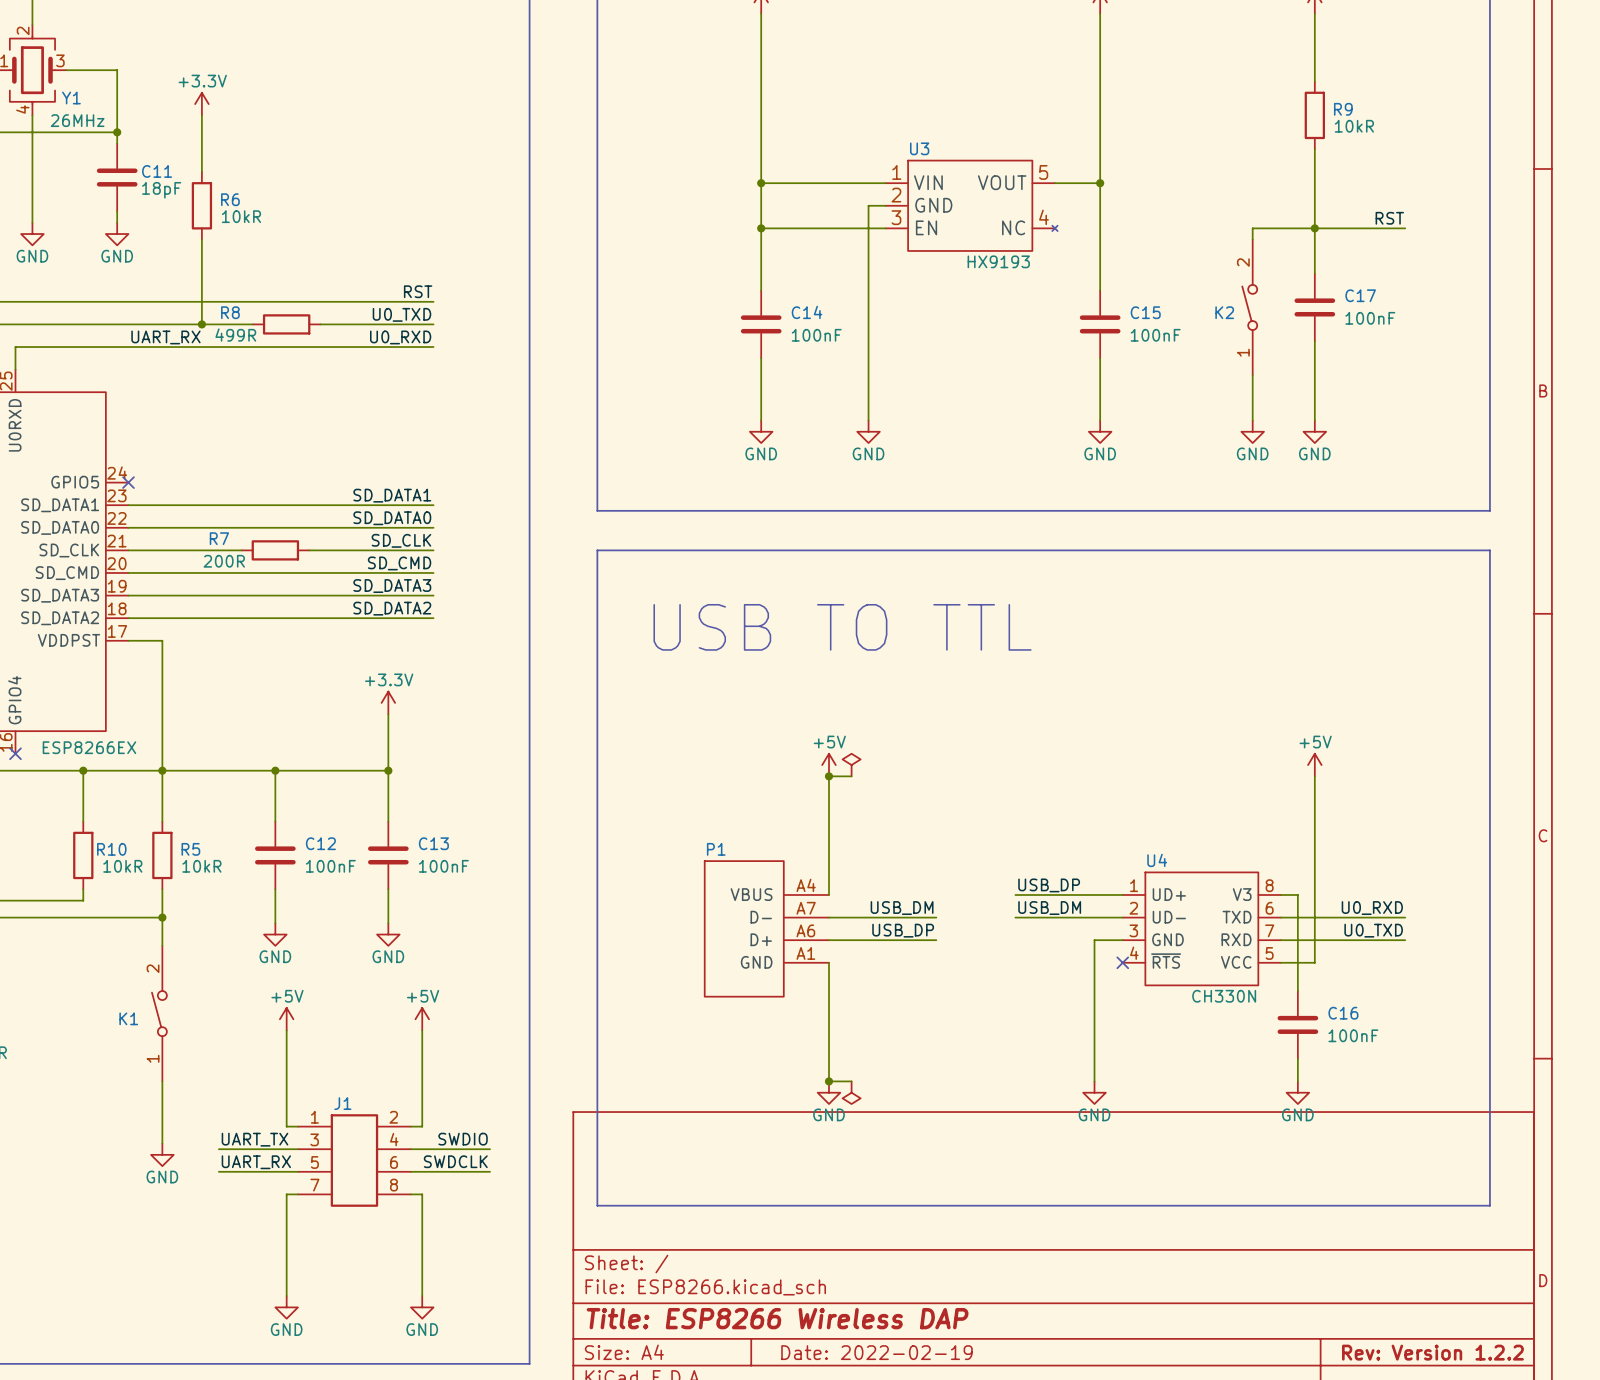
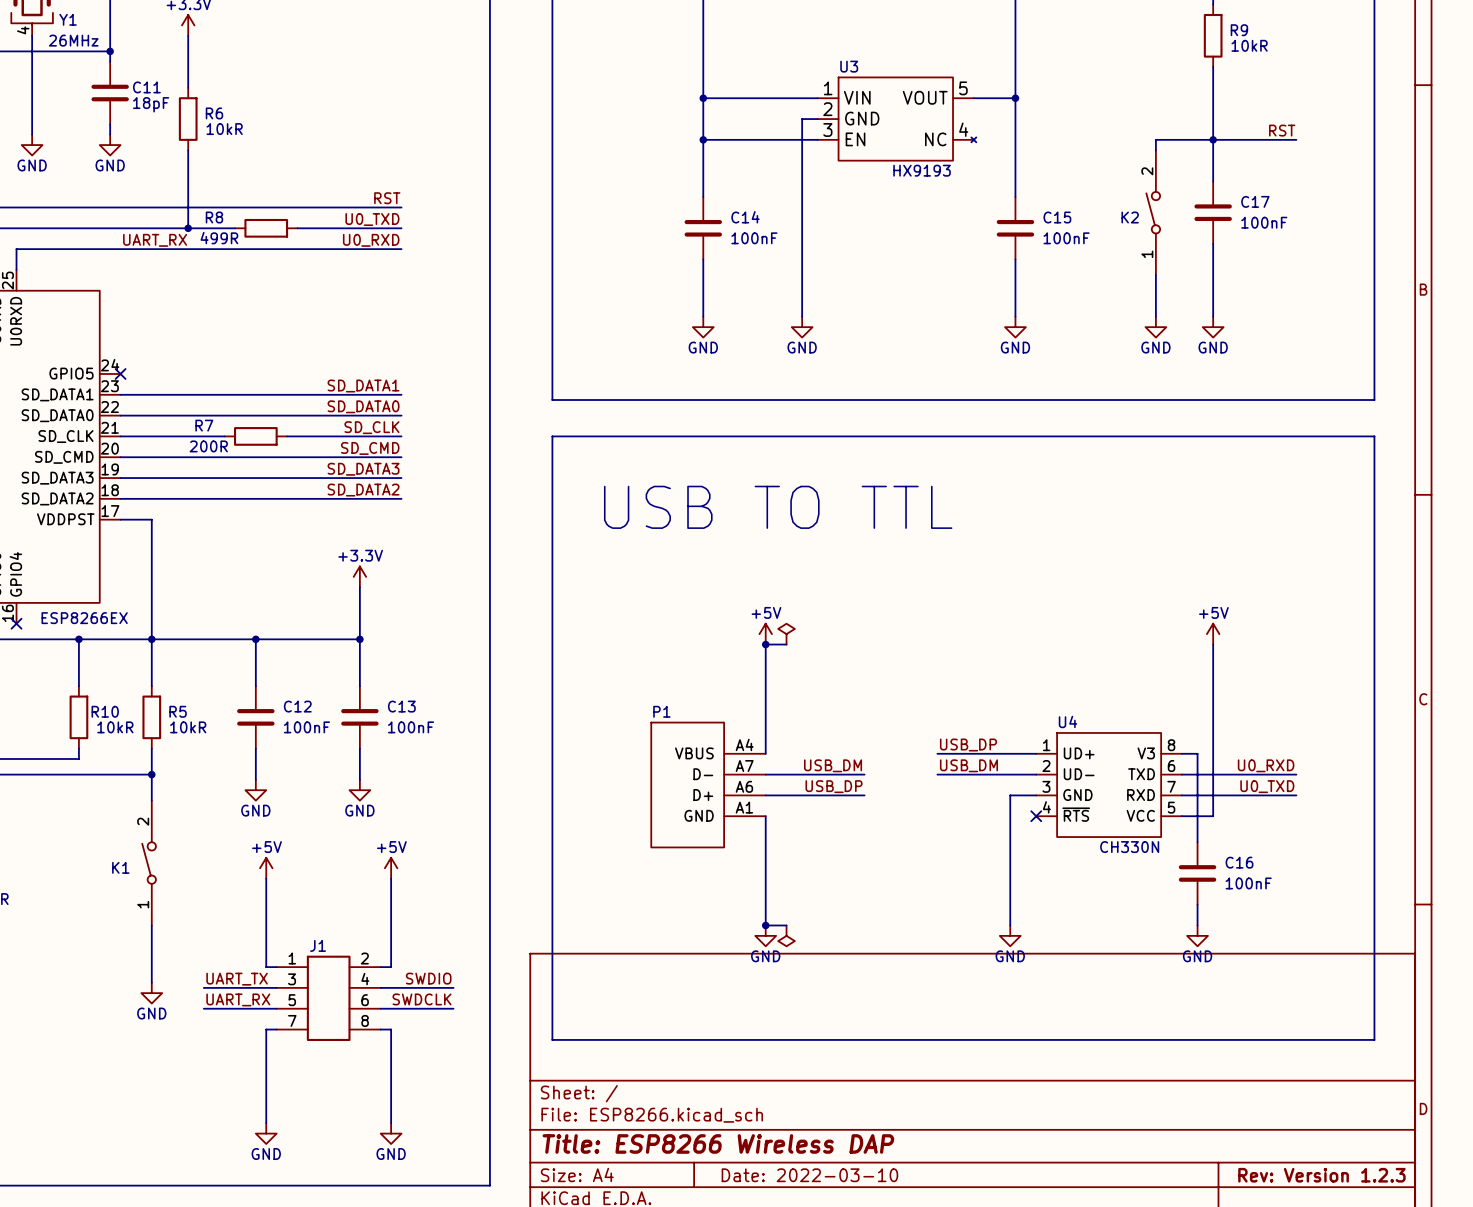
title block: Date: 2022-02-19 (876, 1352) -> Date: 2022-03-10 (809, 1175)
title block: Rev: Version 1.2.2 (1432, 1352) -> Rev: Version 1.2.3 (1321, 1175)

